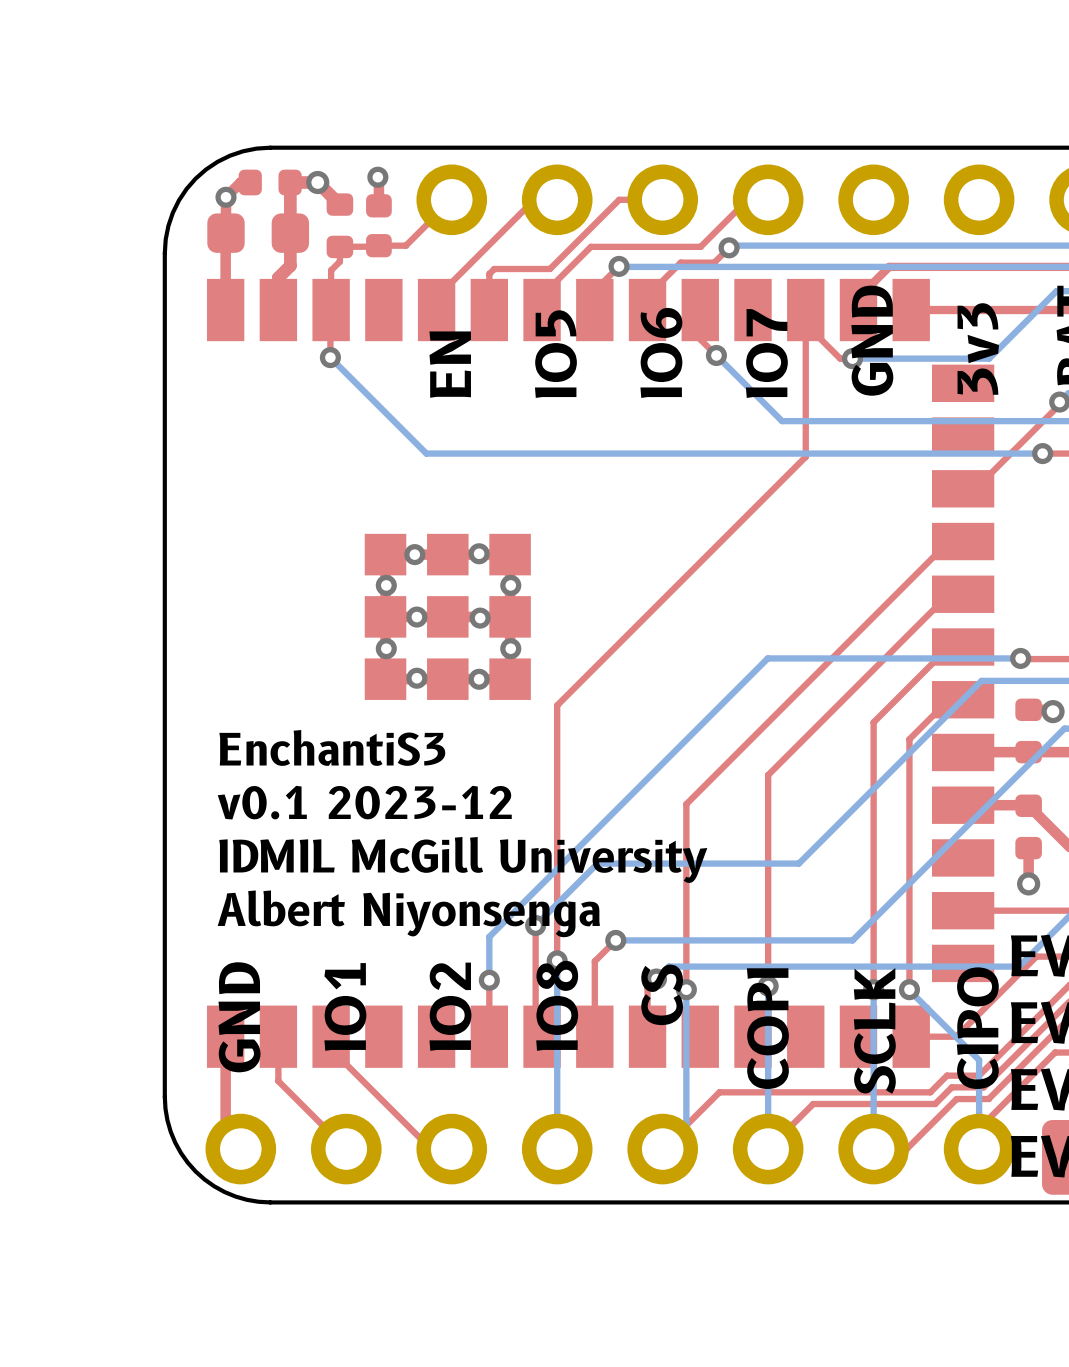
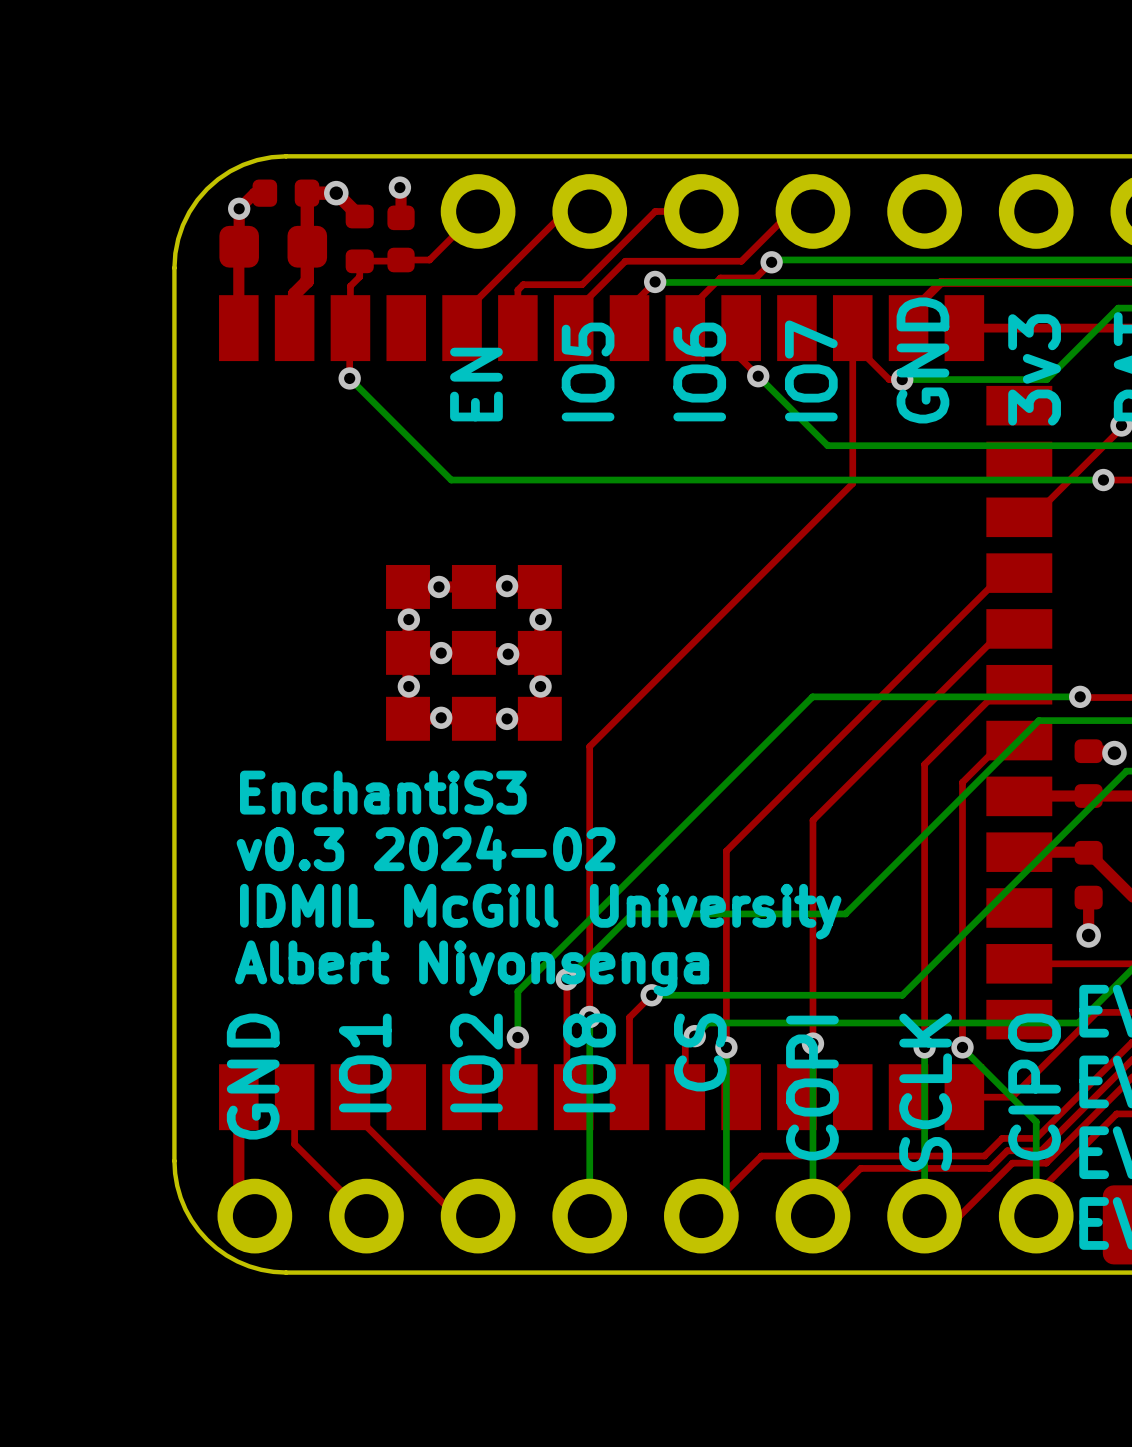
text: v0.1 2023-12 (364, 802) -> v0.3 2024-02 (426, 848)

